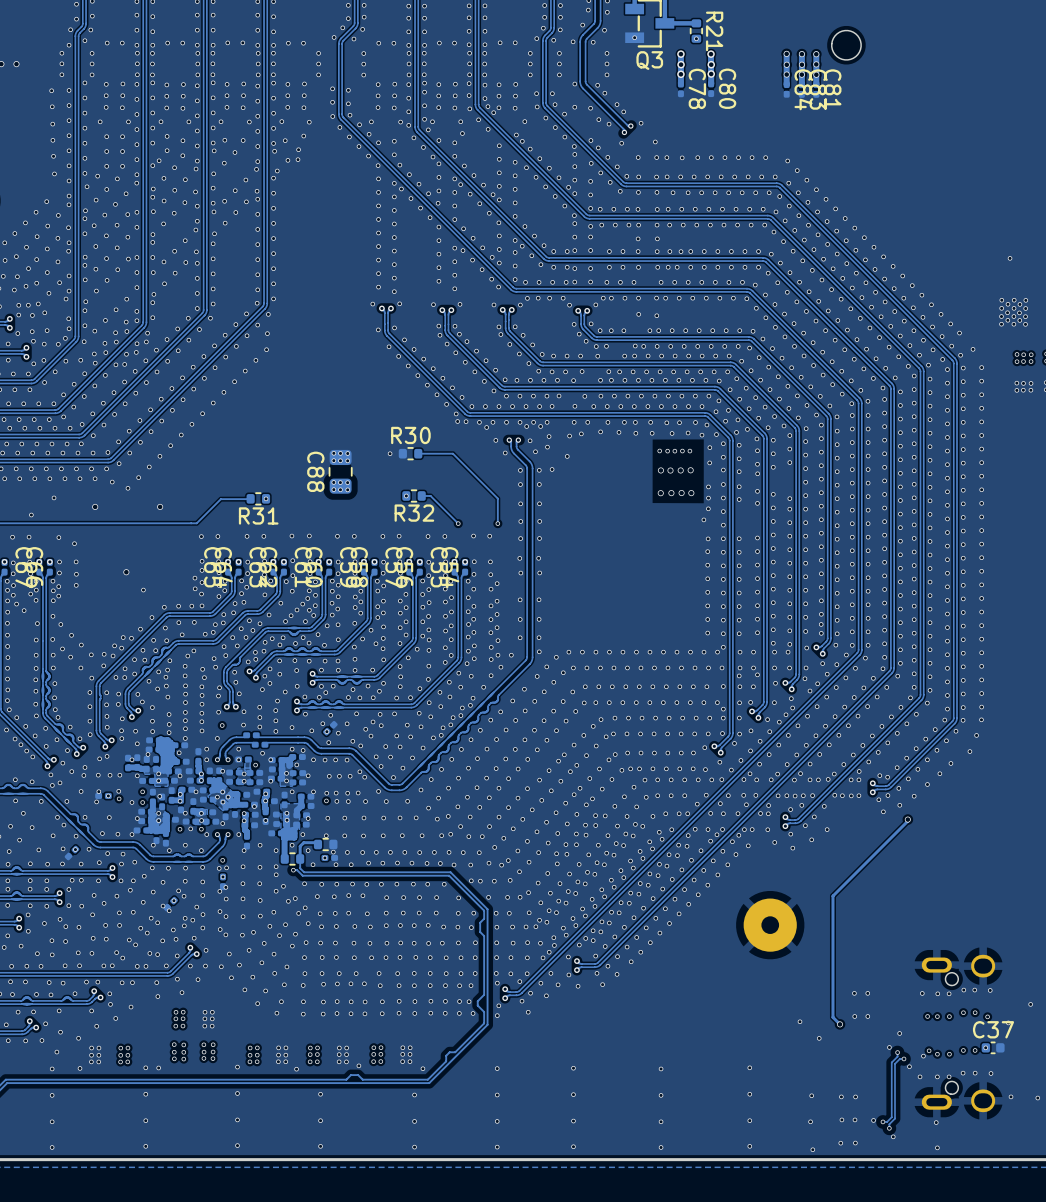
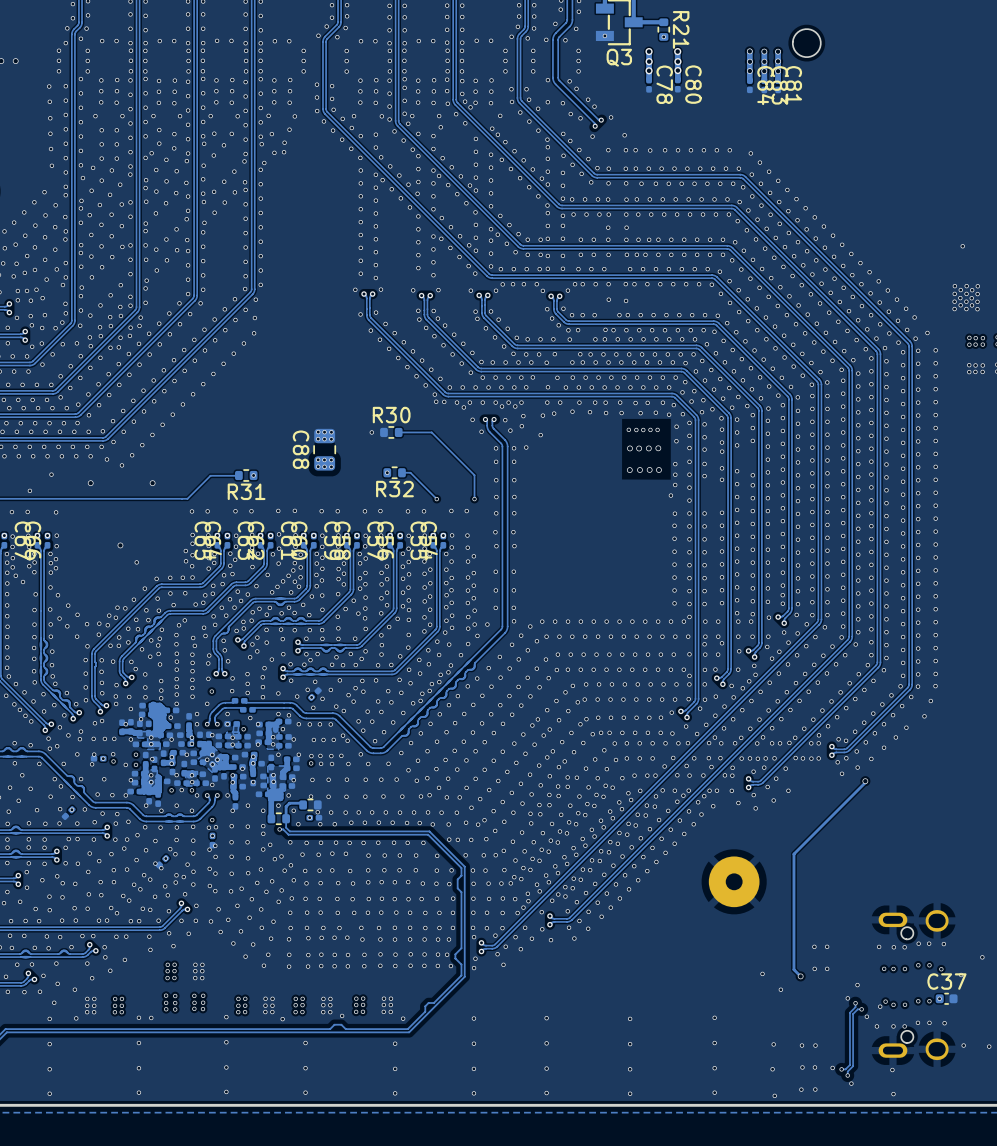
via: (74, 543) -> none
via: (76, 561) -> none
via: (76, 574) -> none
via: (76, 585) -> none
via: (118, 704) -> none

